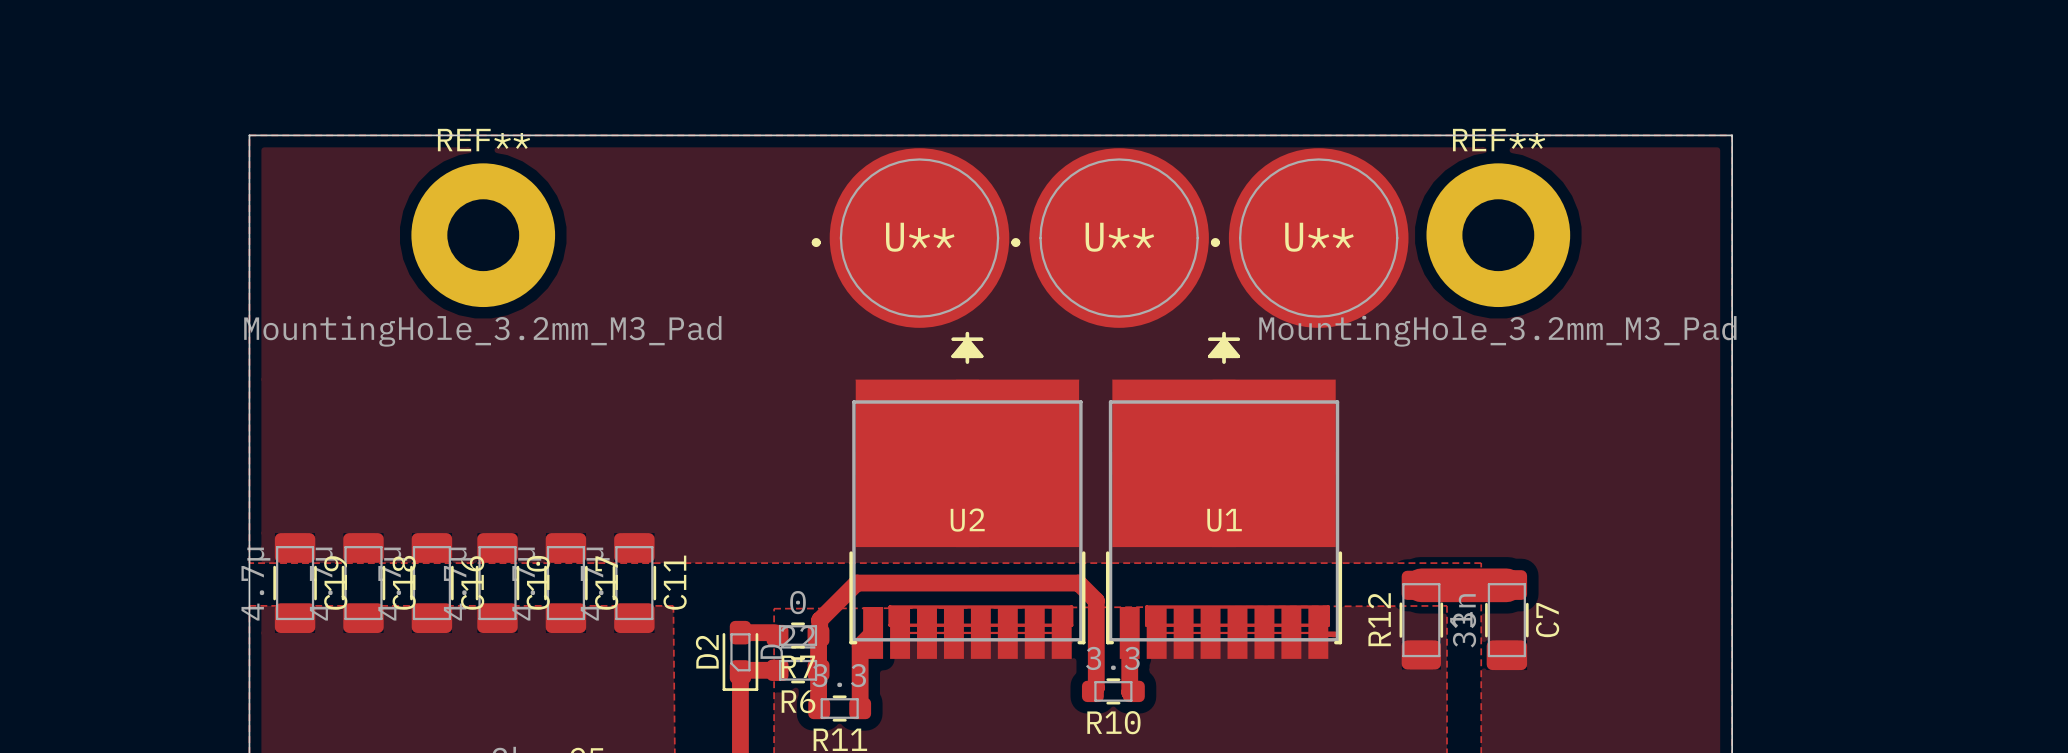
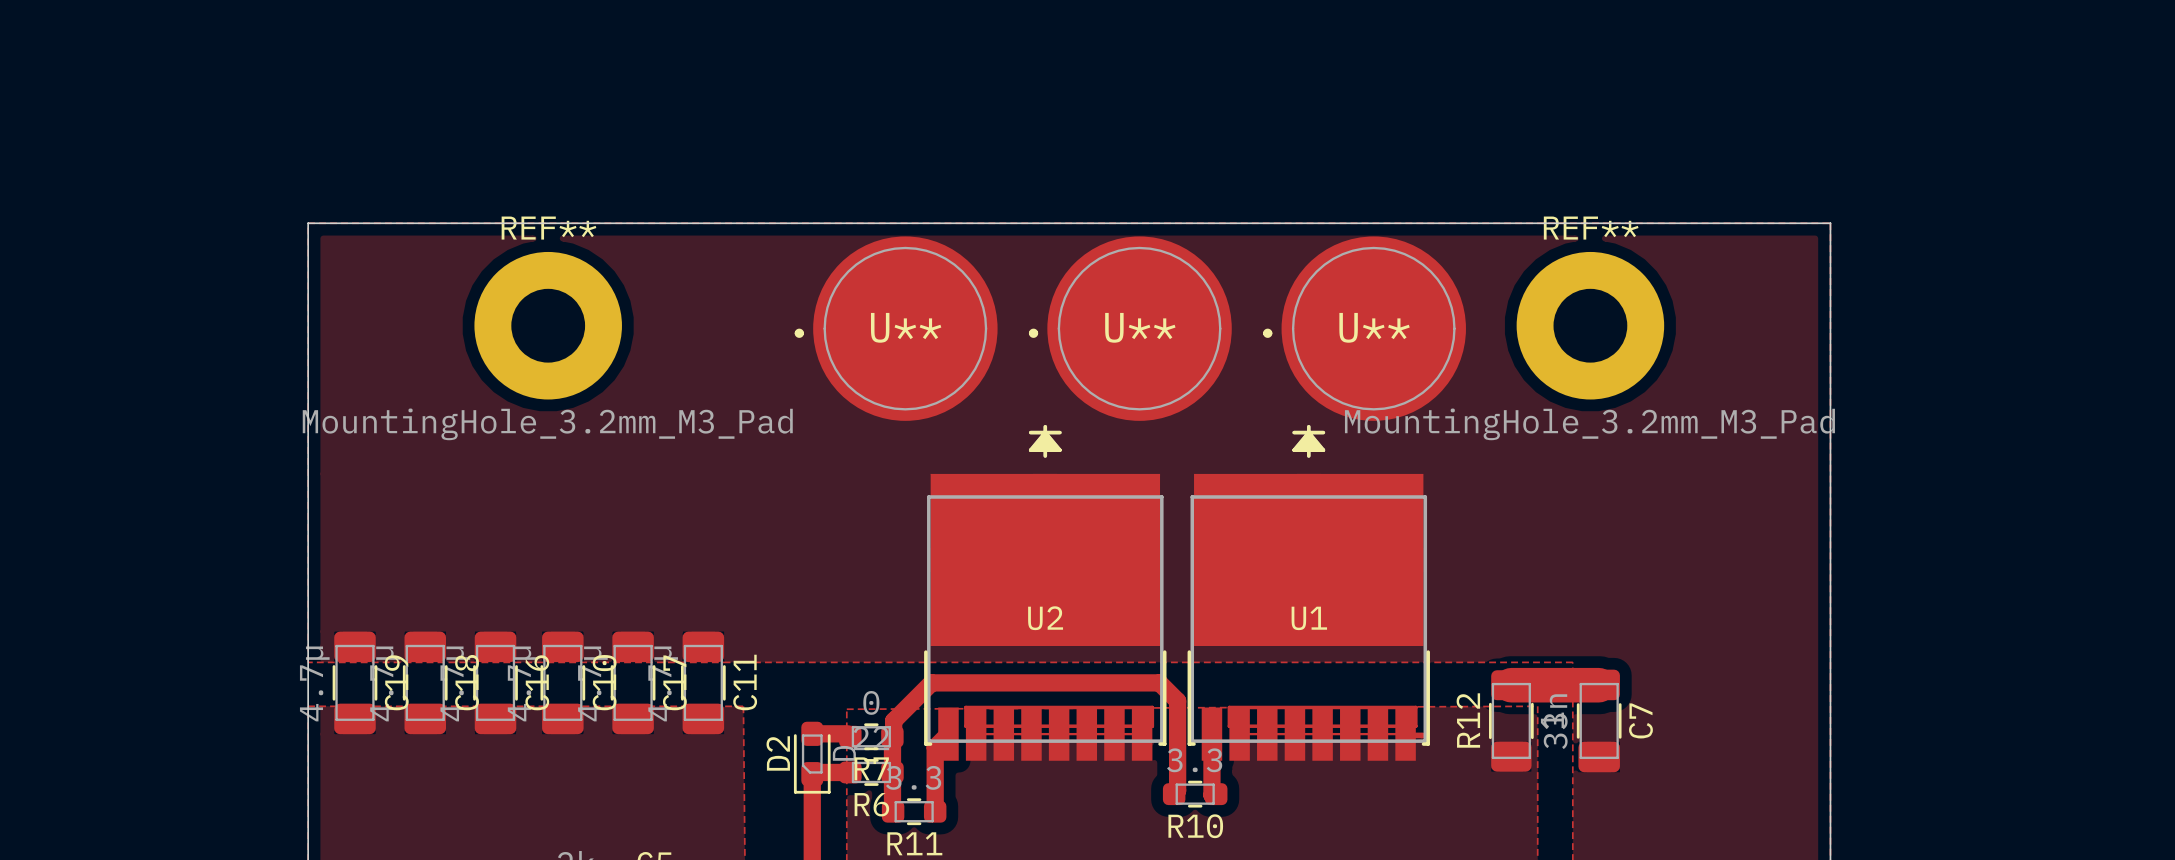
U**: none -> (896, 328)
U**: (910, 238) -> none
U** position: (1110, 238) -> (1130, 328)
U** position: (1309, 238) -> (1364, 328)

